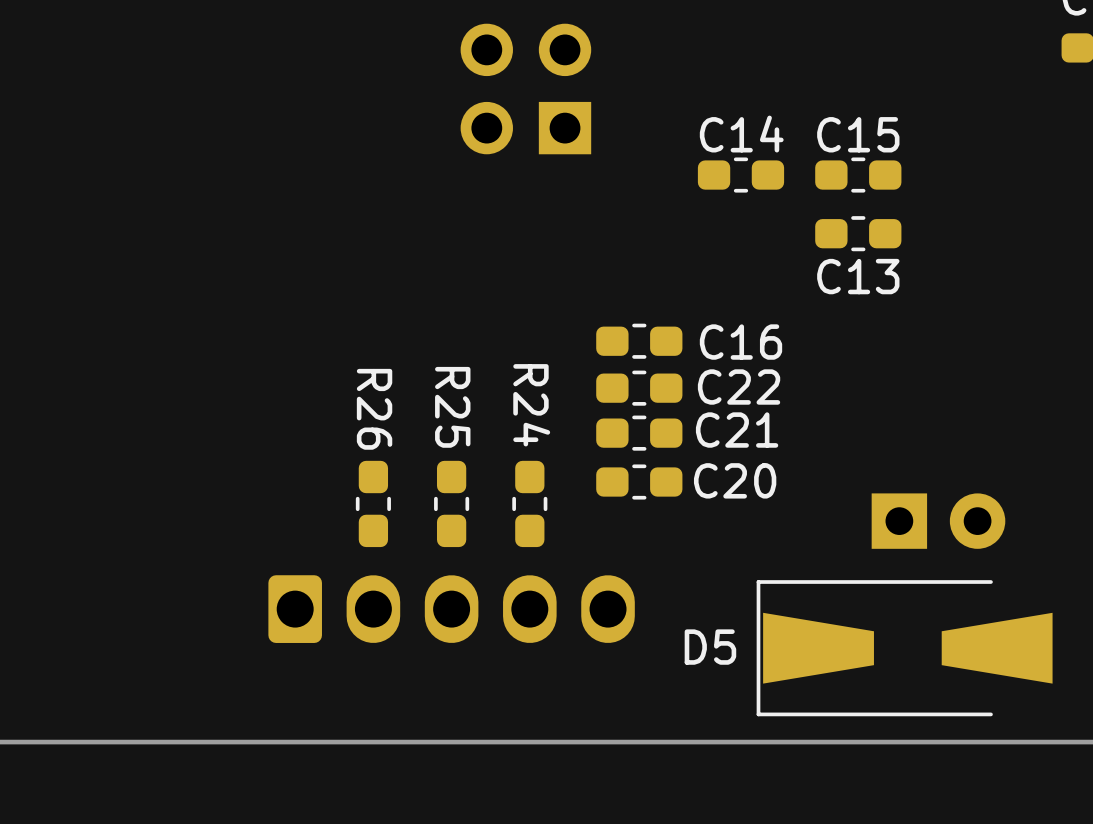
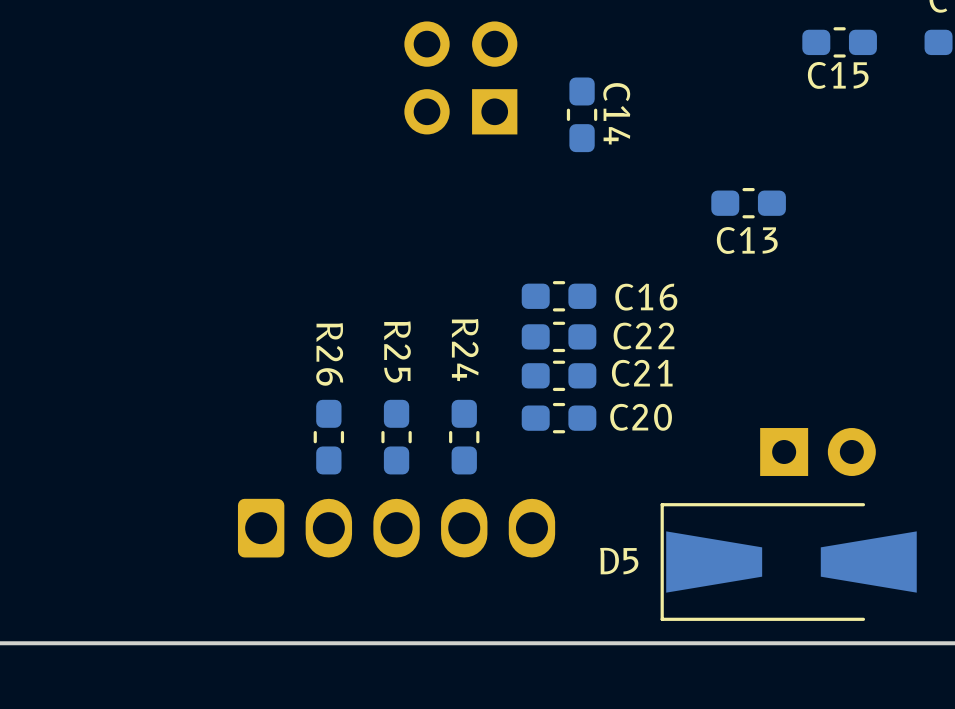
C15 name position: C15 (858, 134) -> C15 (838, 75)
C14 rotation: 0° (740, 175) -> 90° clockwise (582, 114)
C14 position: (740, 175) -> (582, 114)
C15 position: (858, 175) -> (839, 42)

